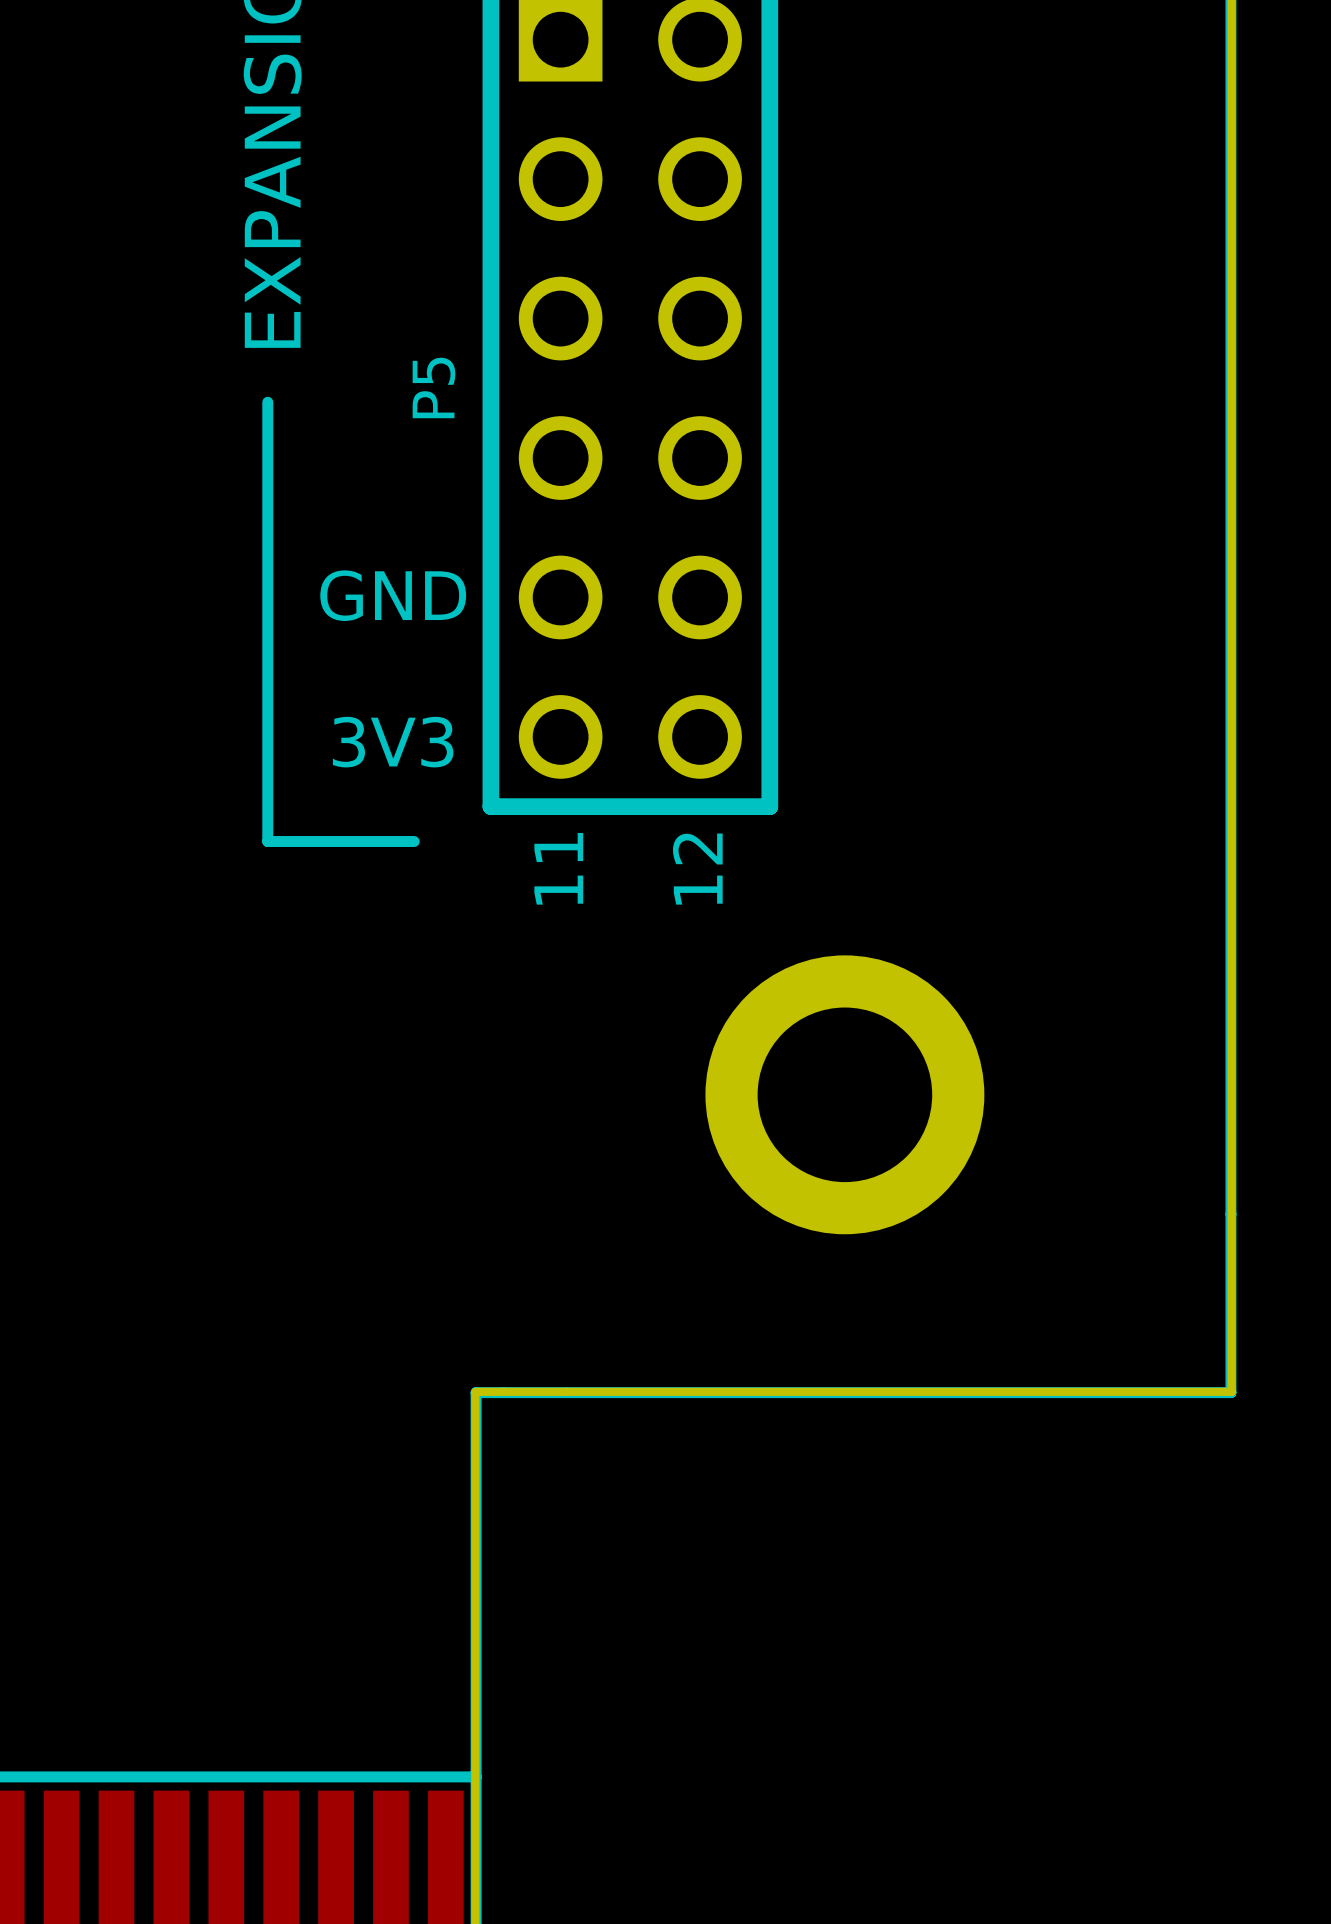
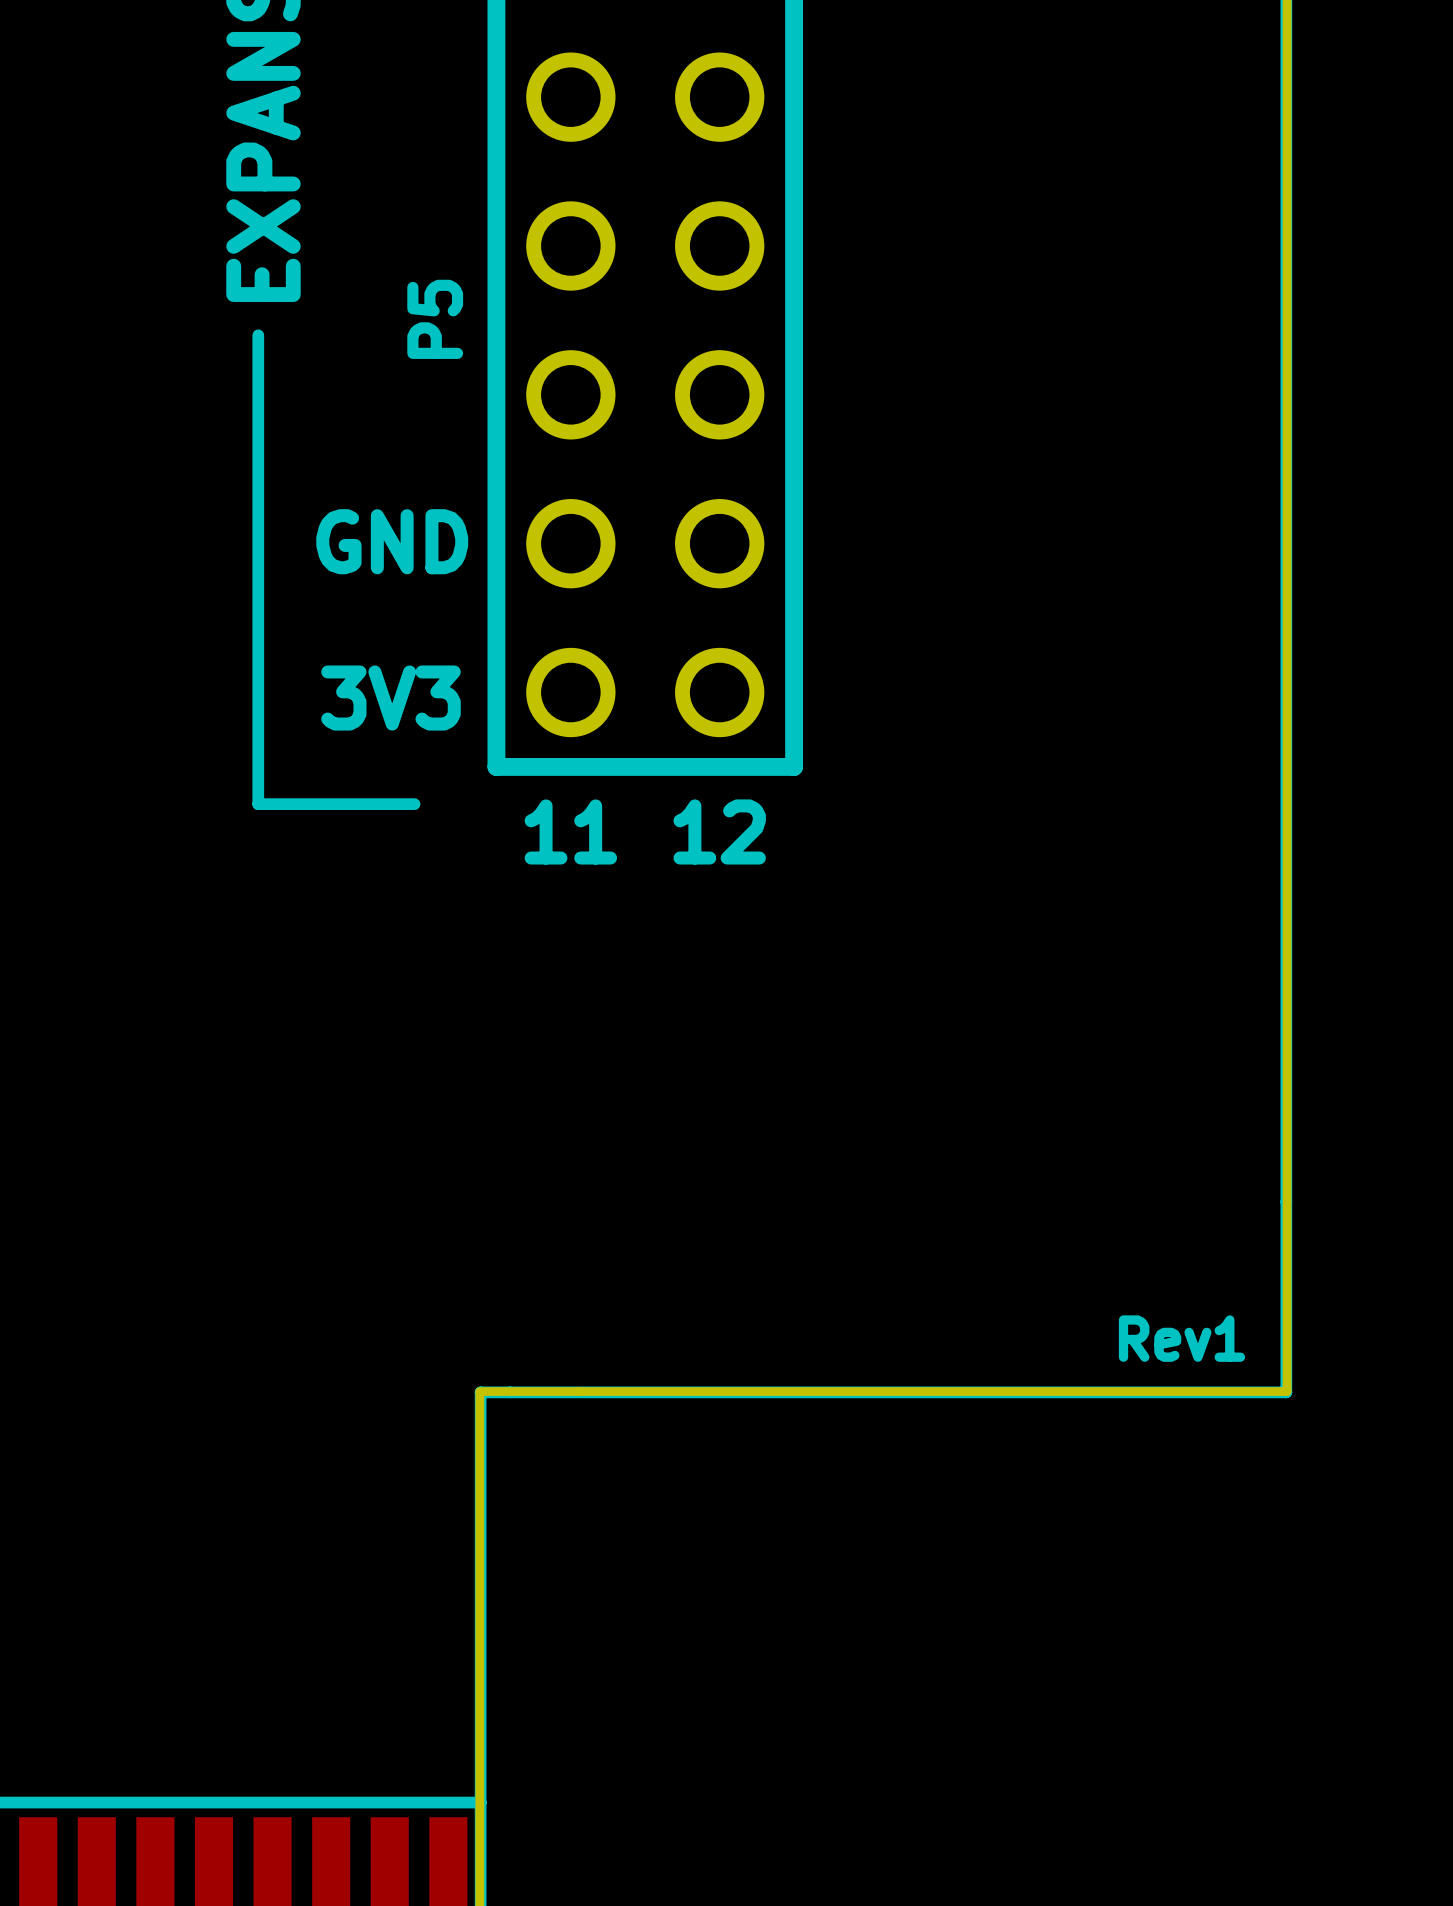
text rotation: 0° (558, 868) -> 90° clockwise (570, 831)
text rotation: 0° (697, 869) -> 90° clockwise (719, 831)
part: (844, 1094) -> none
text: none -> Rev1 (1181, 1338)

